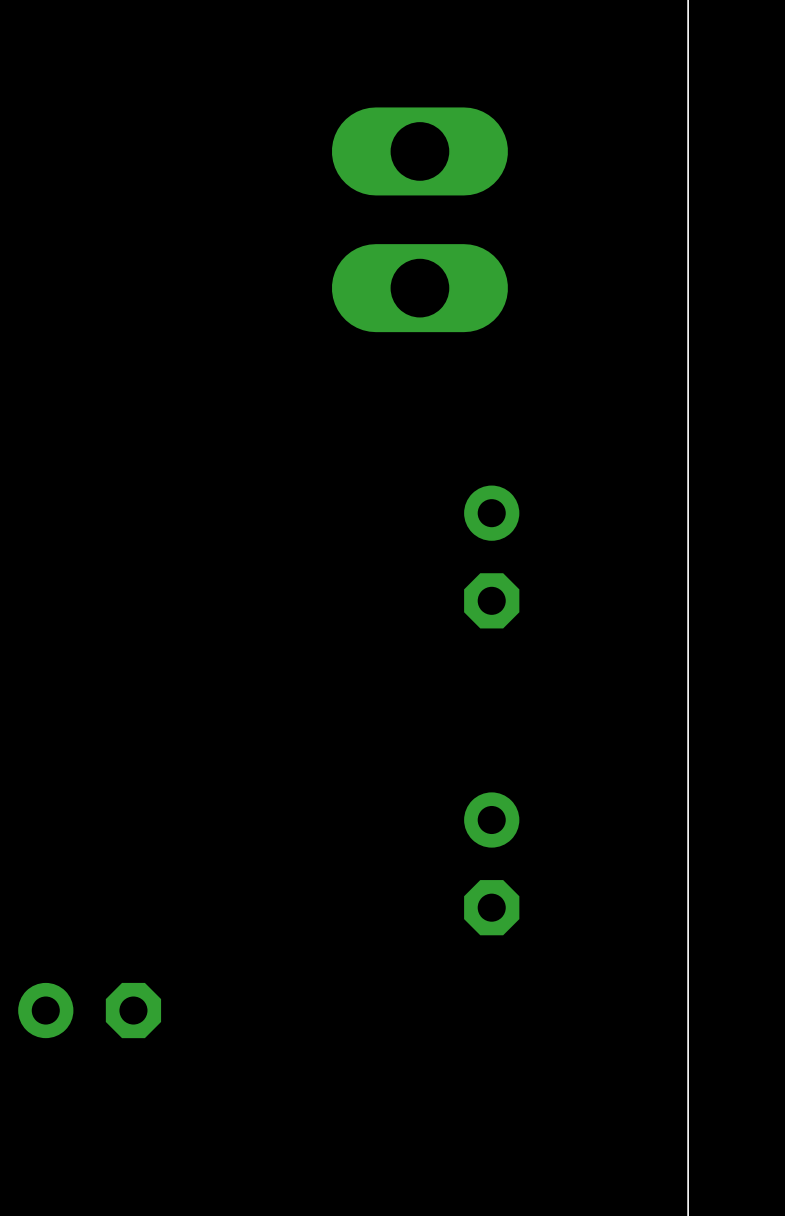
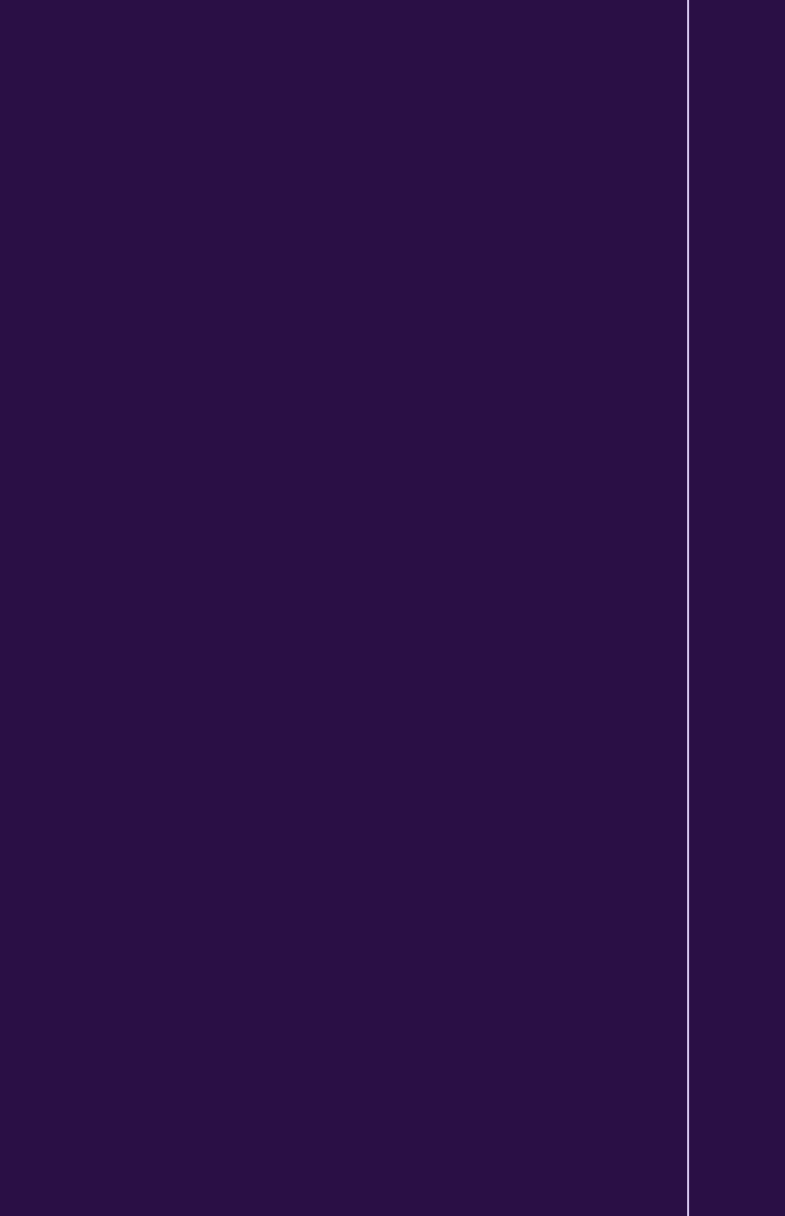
part: (419, 219) -> none
part: (491, 557) -> none
part: (491, 863) -> none
part: (89, 1010) -> none

